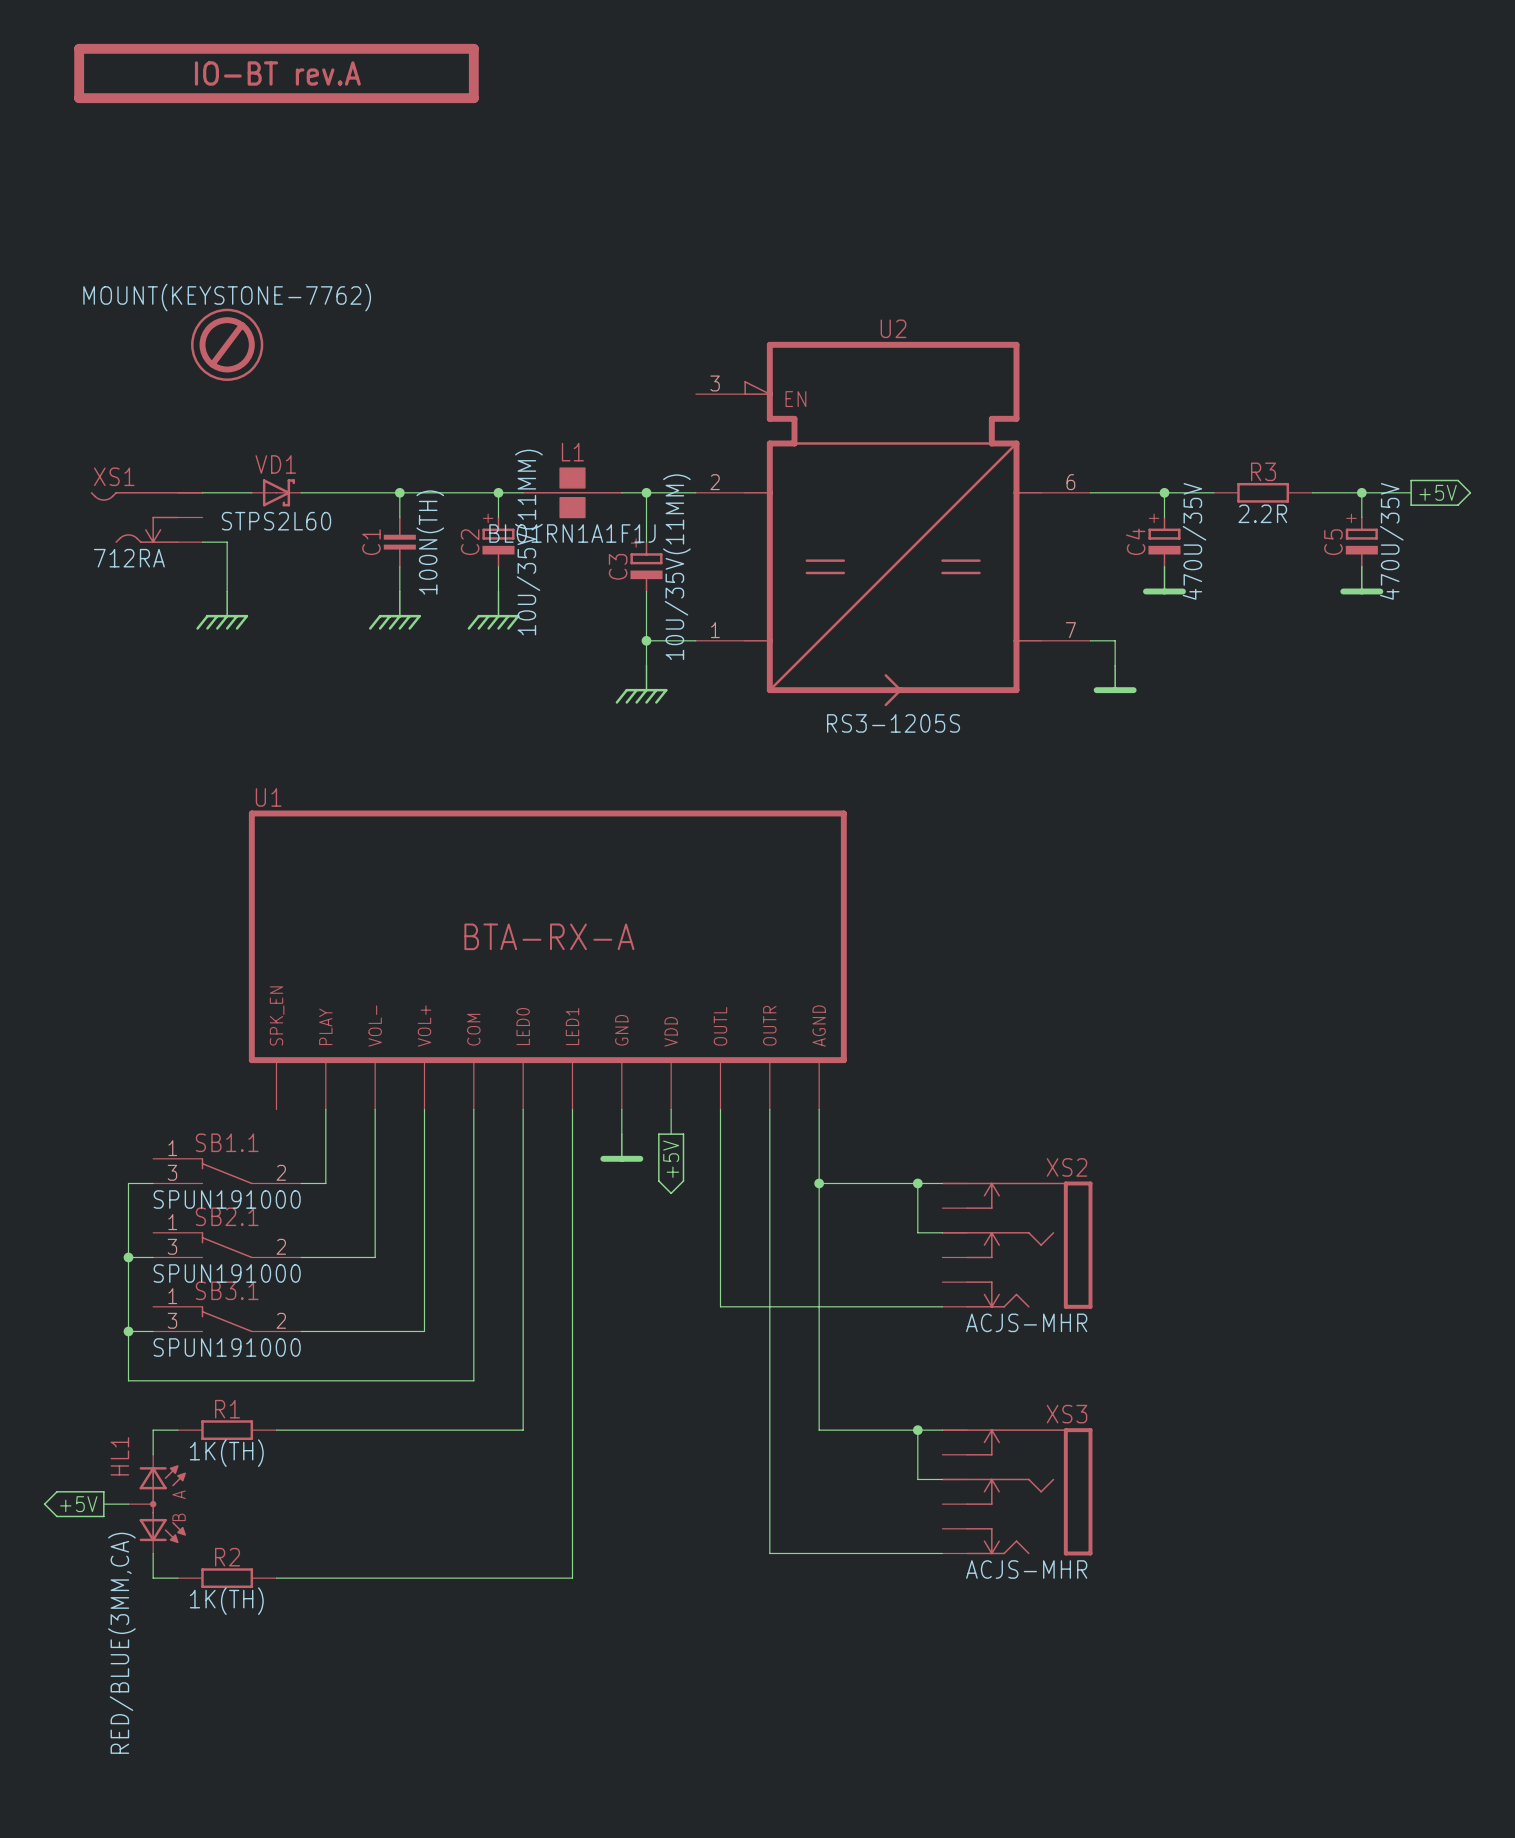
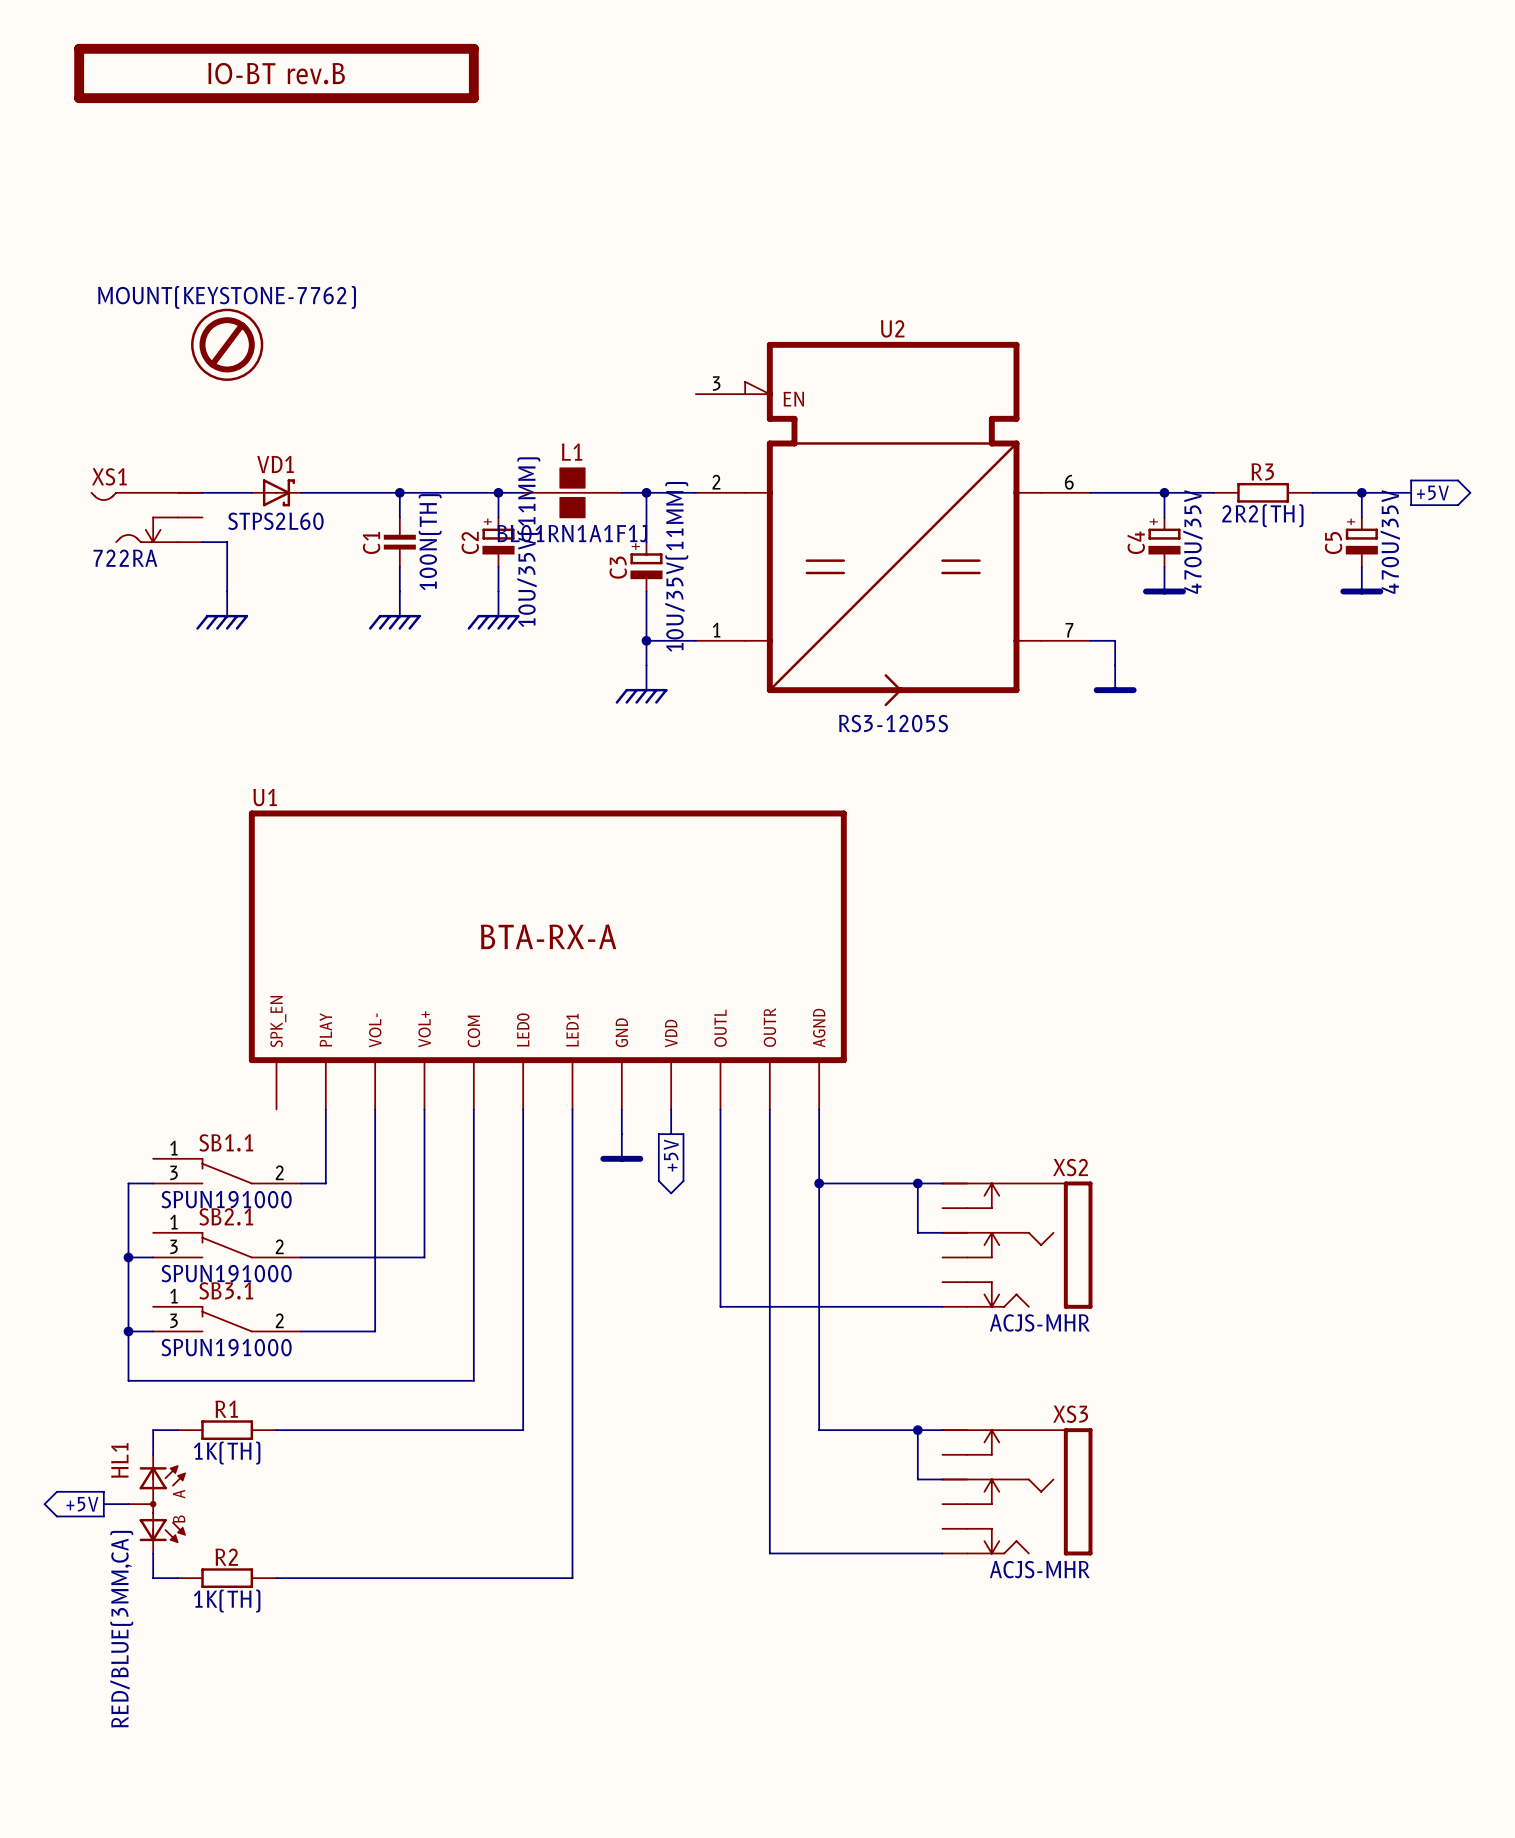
part value: IO-BT rev.A (277, 73) -> IO-BT rev.B (276, 73)
R3 value: 2.2R (1262, 513) -> 2R2(TH) (1262, 515)
XS1 value: 712RA (129, 558) -> 722RA (125, 558)
wire: (424, 1257) (424, 1331) (375, 1331) -> (424, 1257) (375, 1257) (375, 1331)

